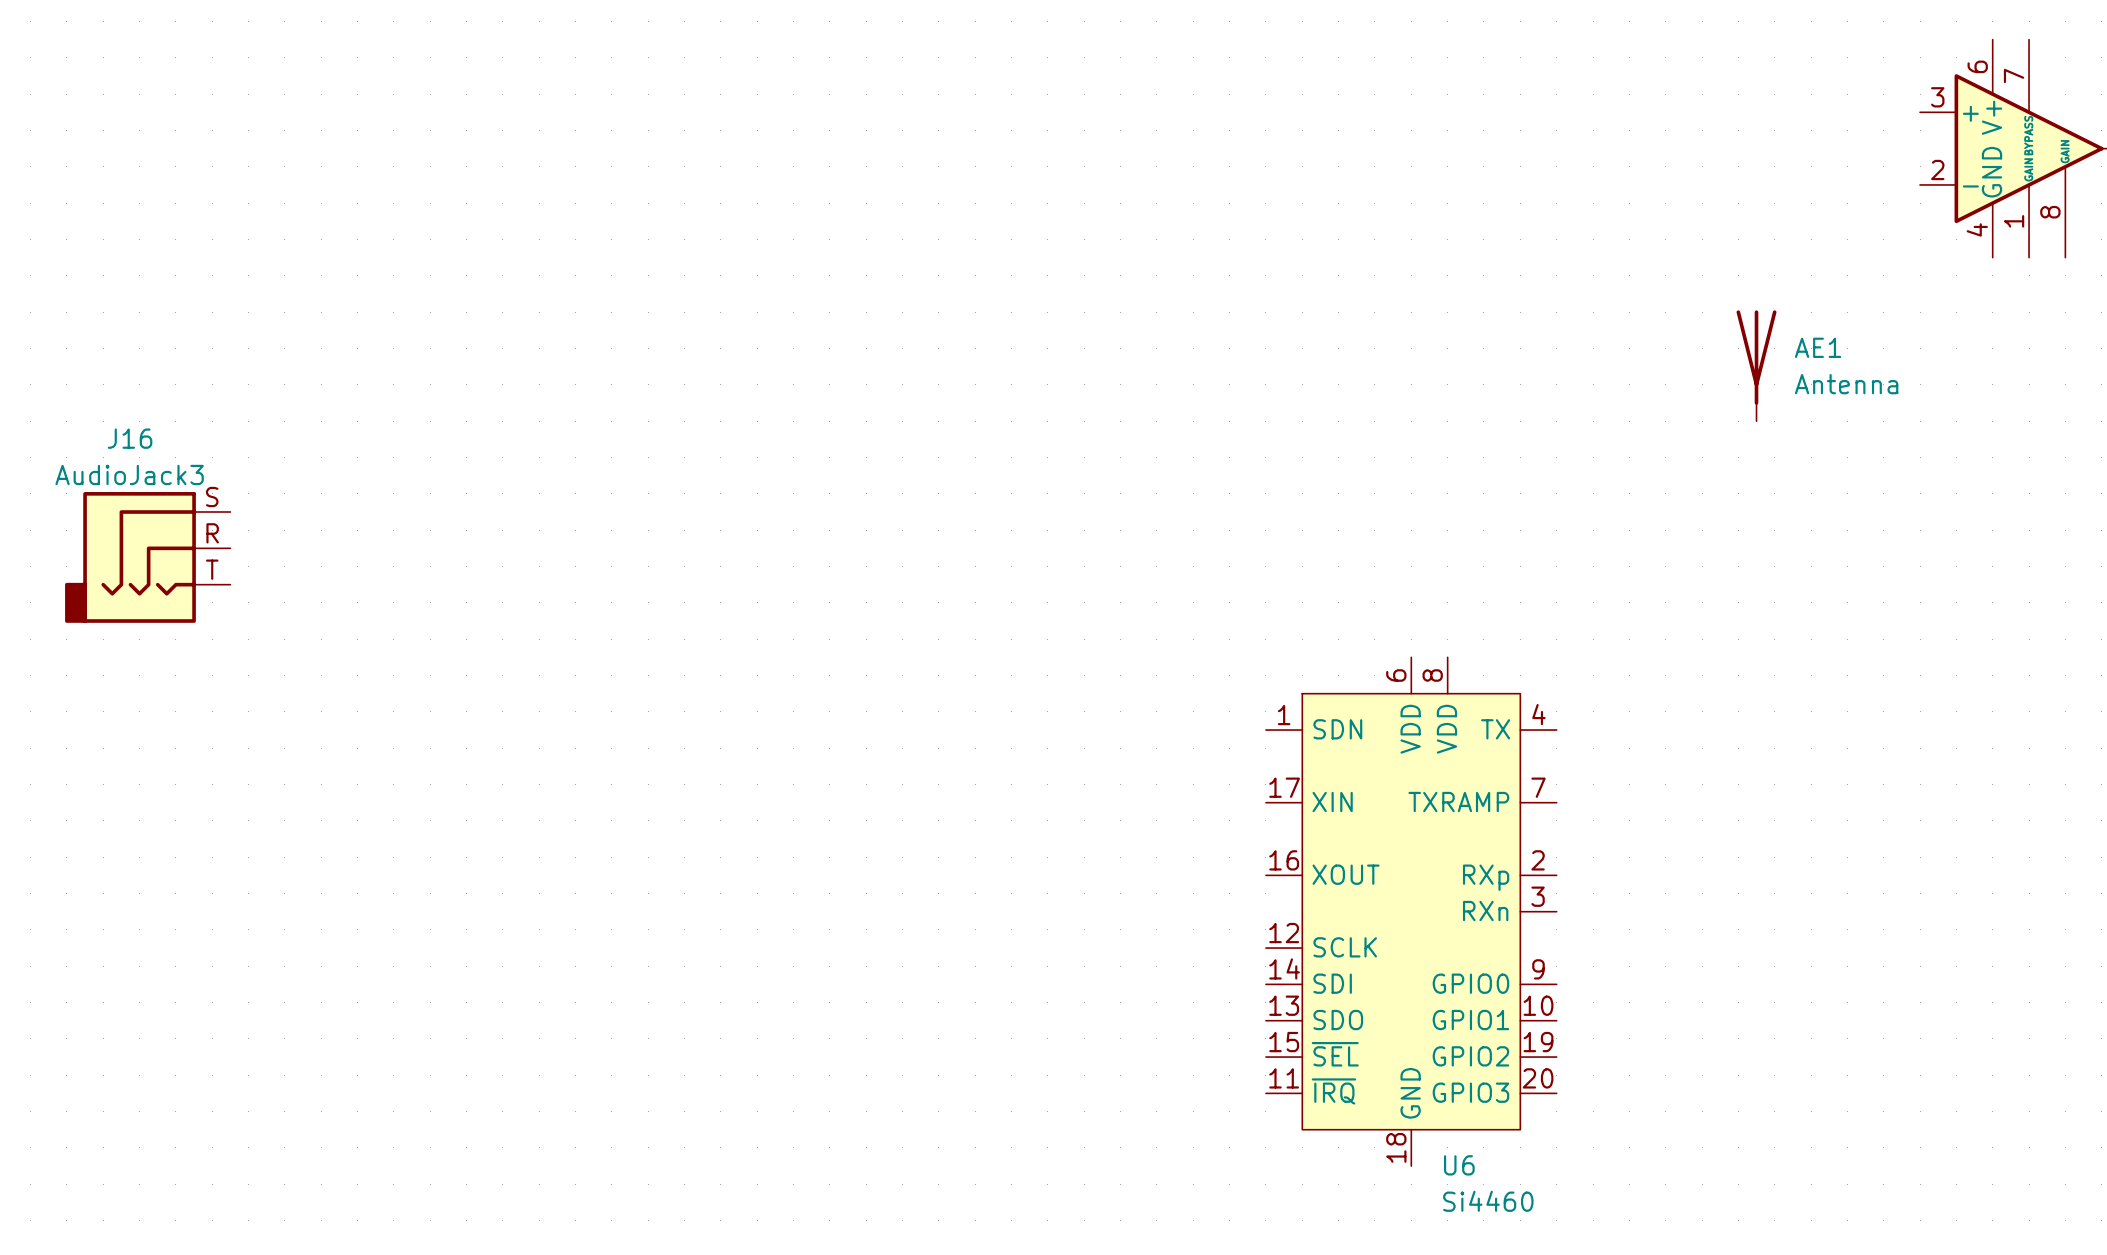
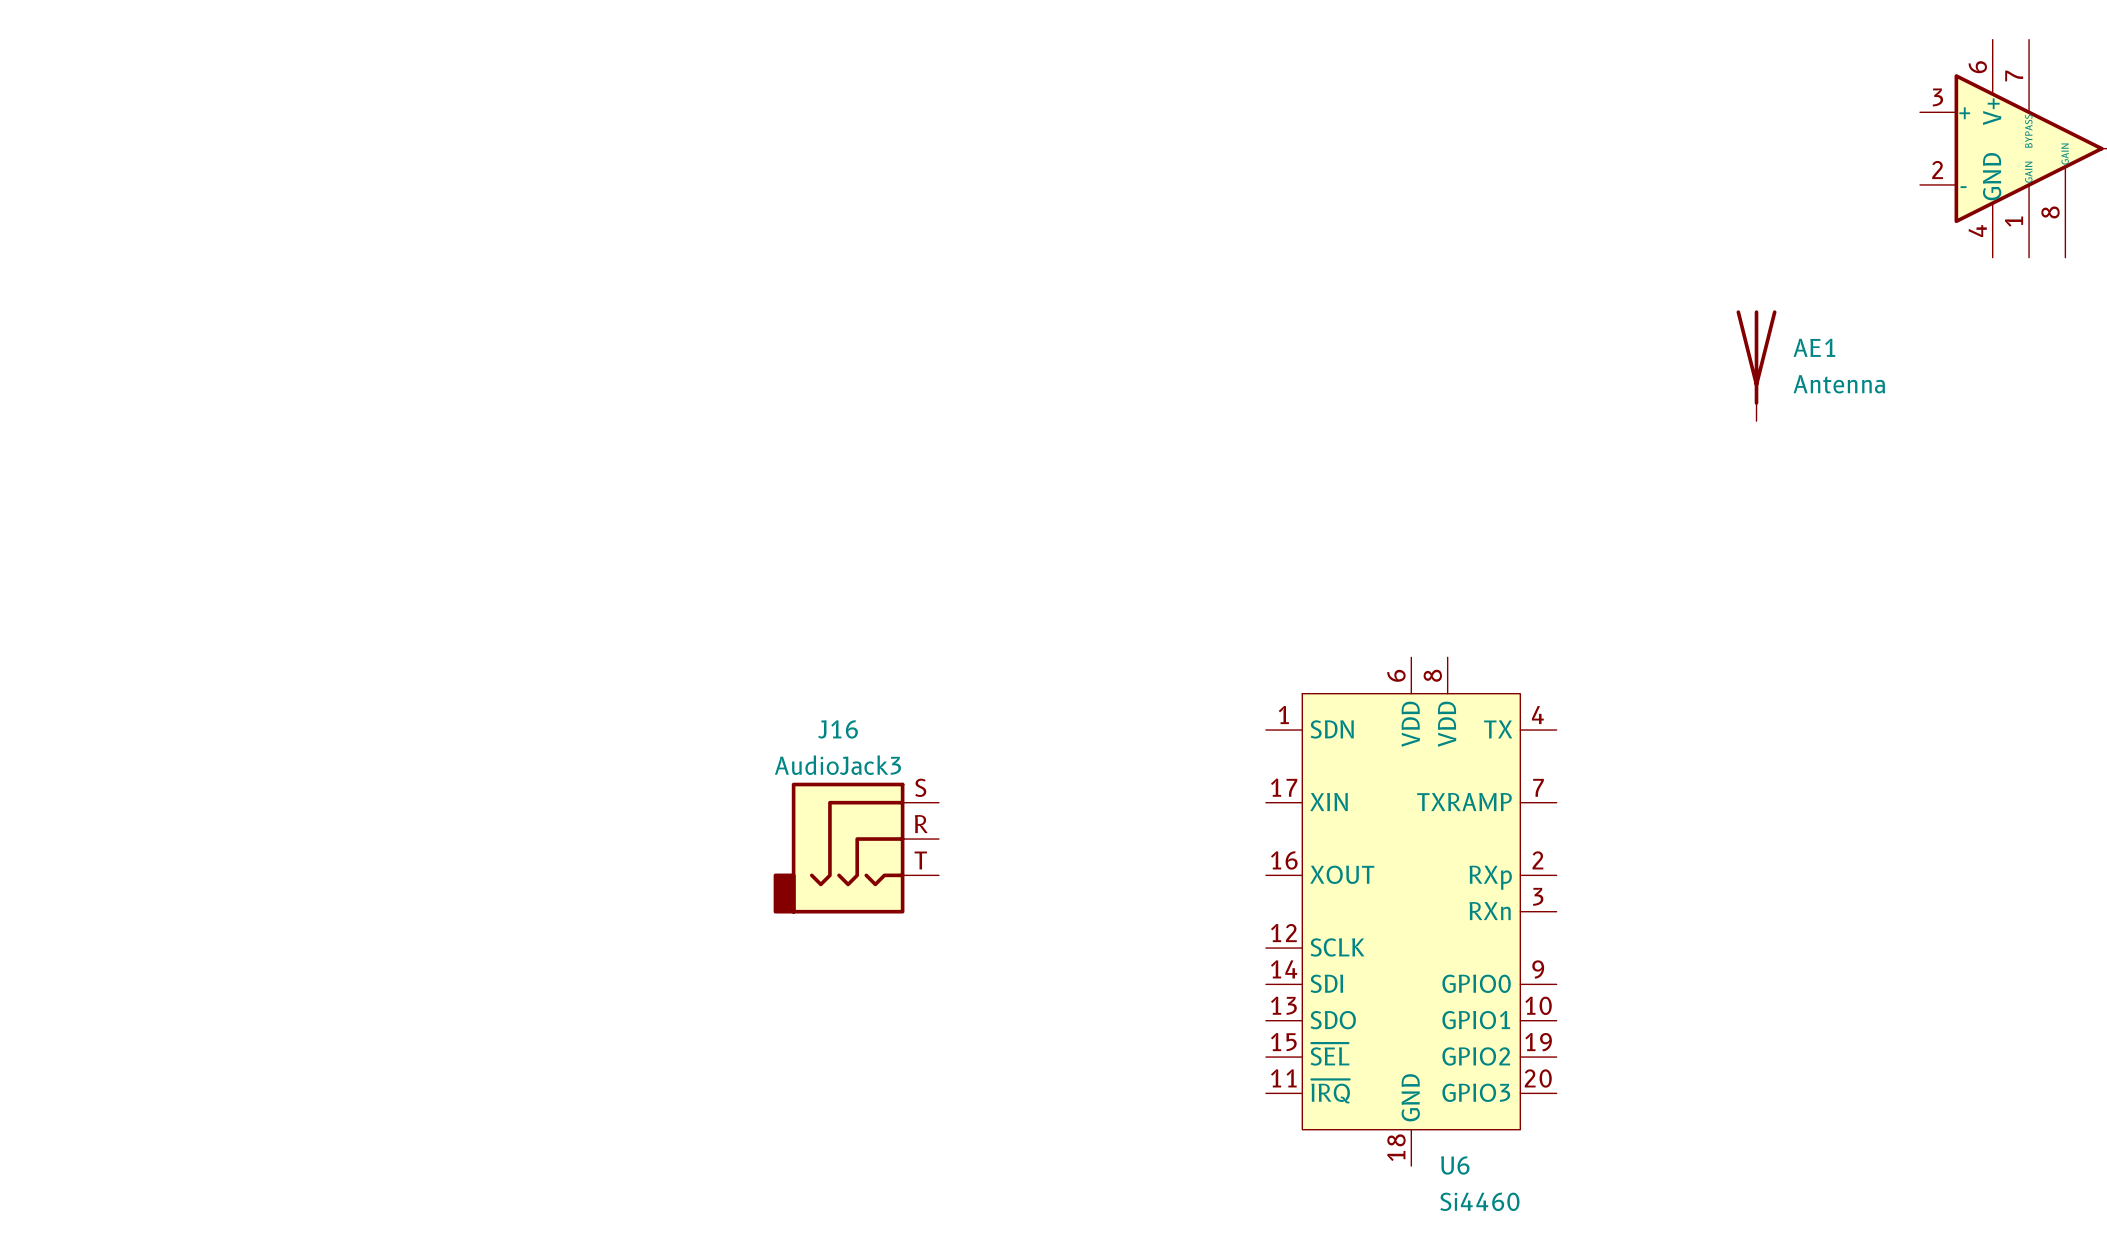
J16 position: (147, 557) -> (856, 848)

